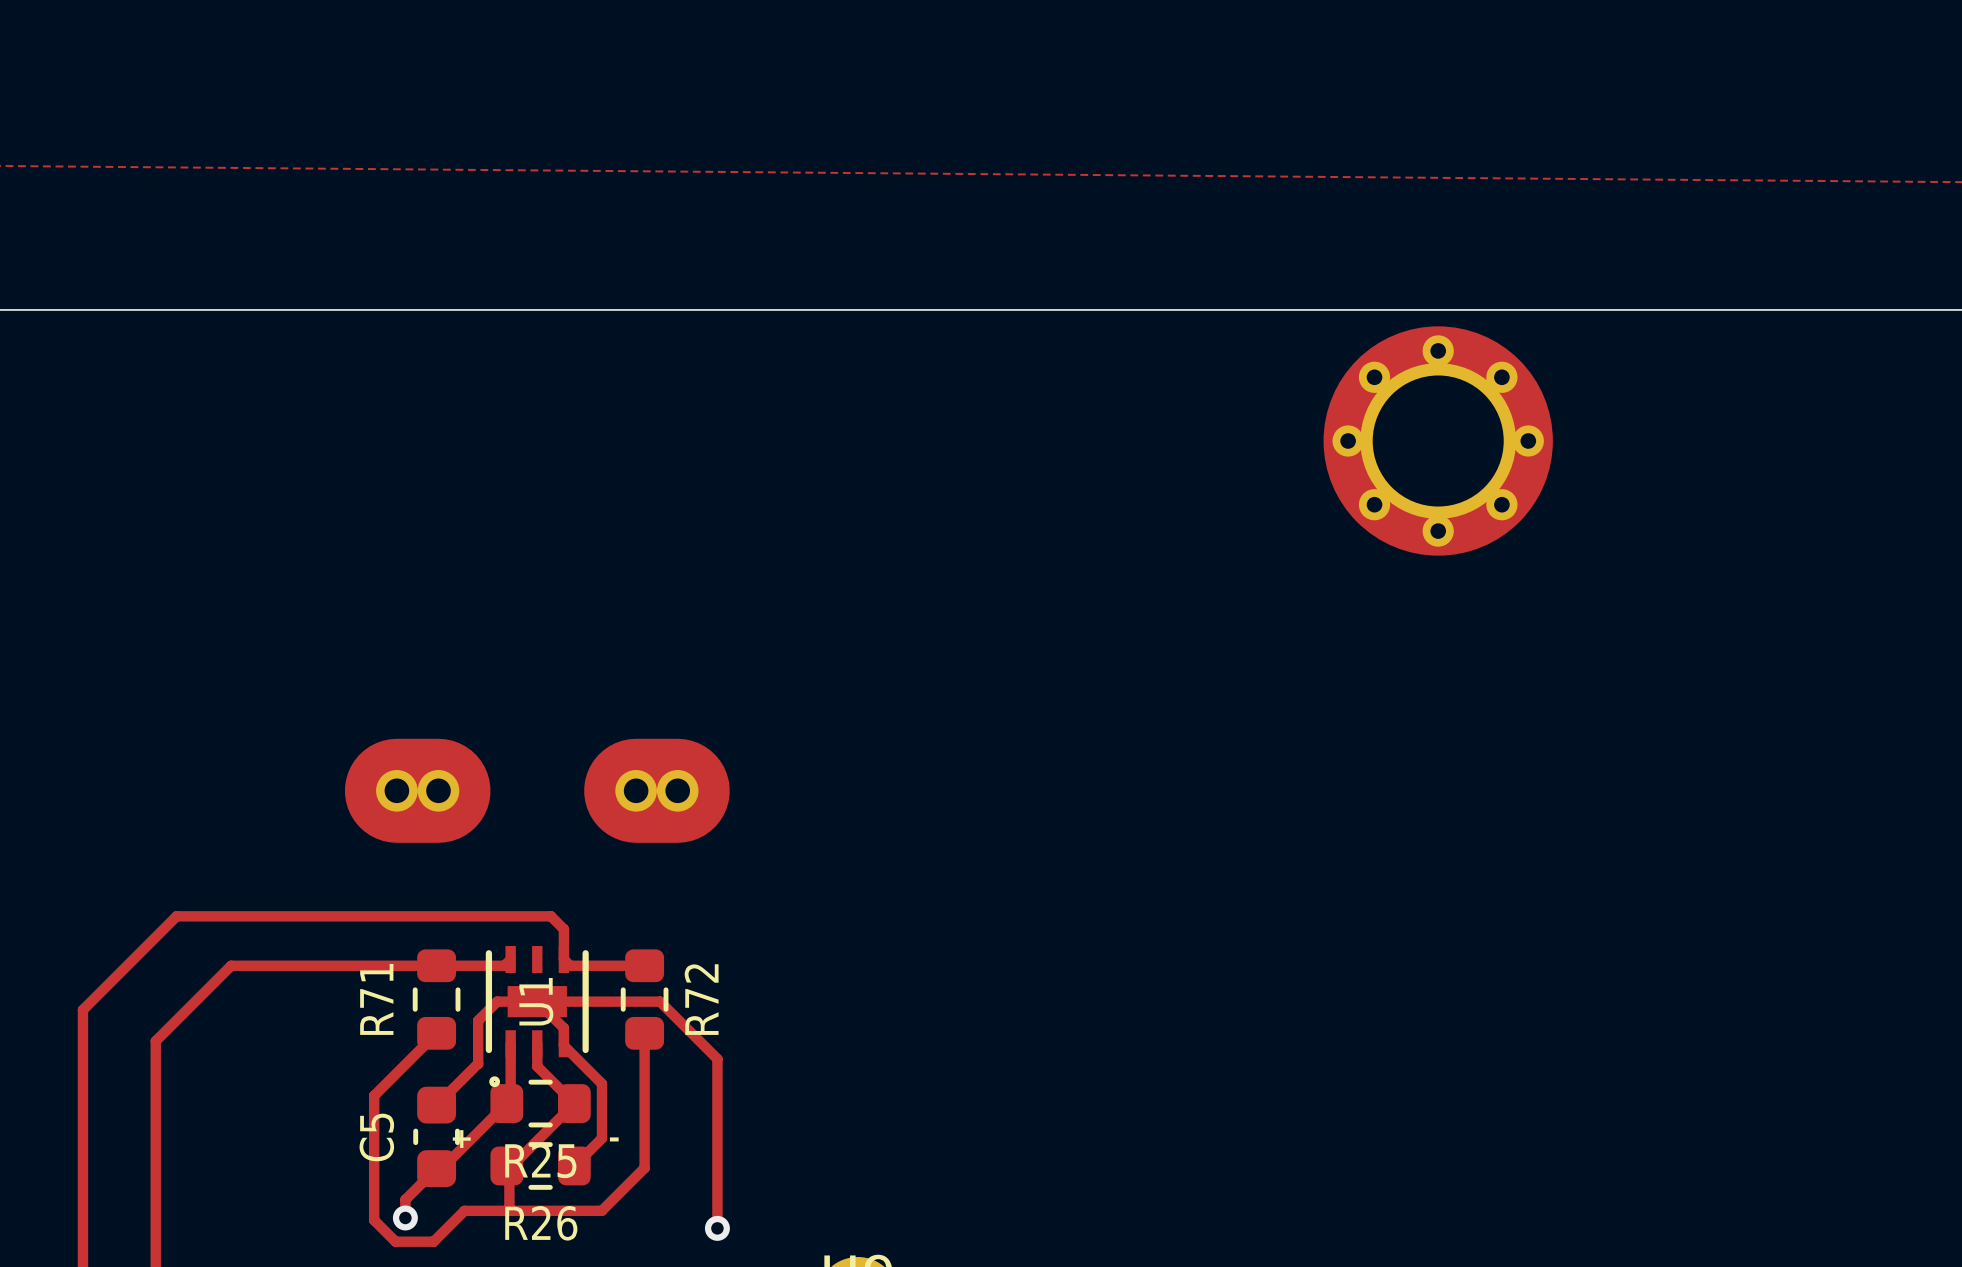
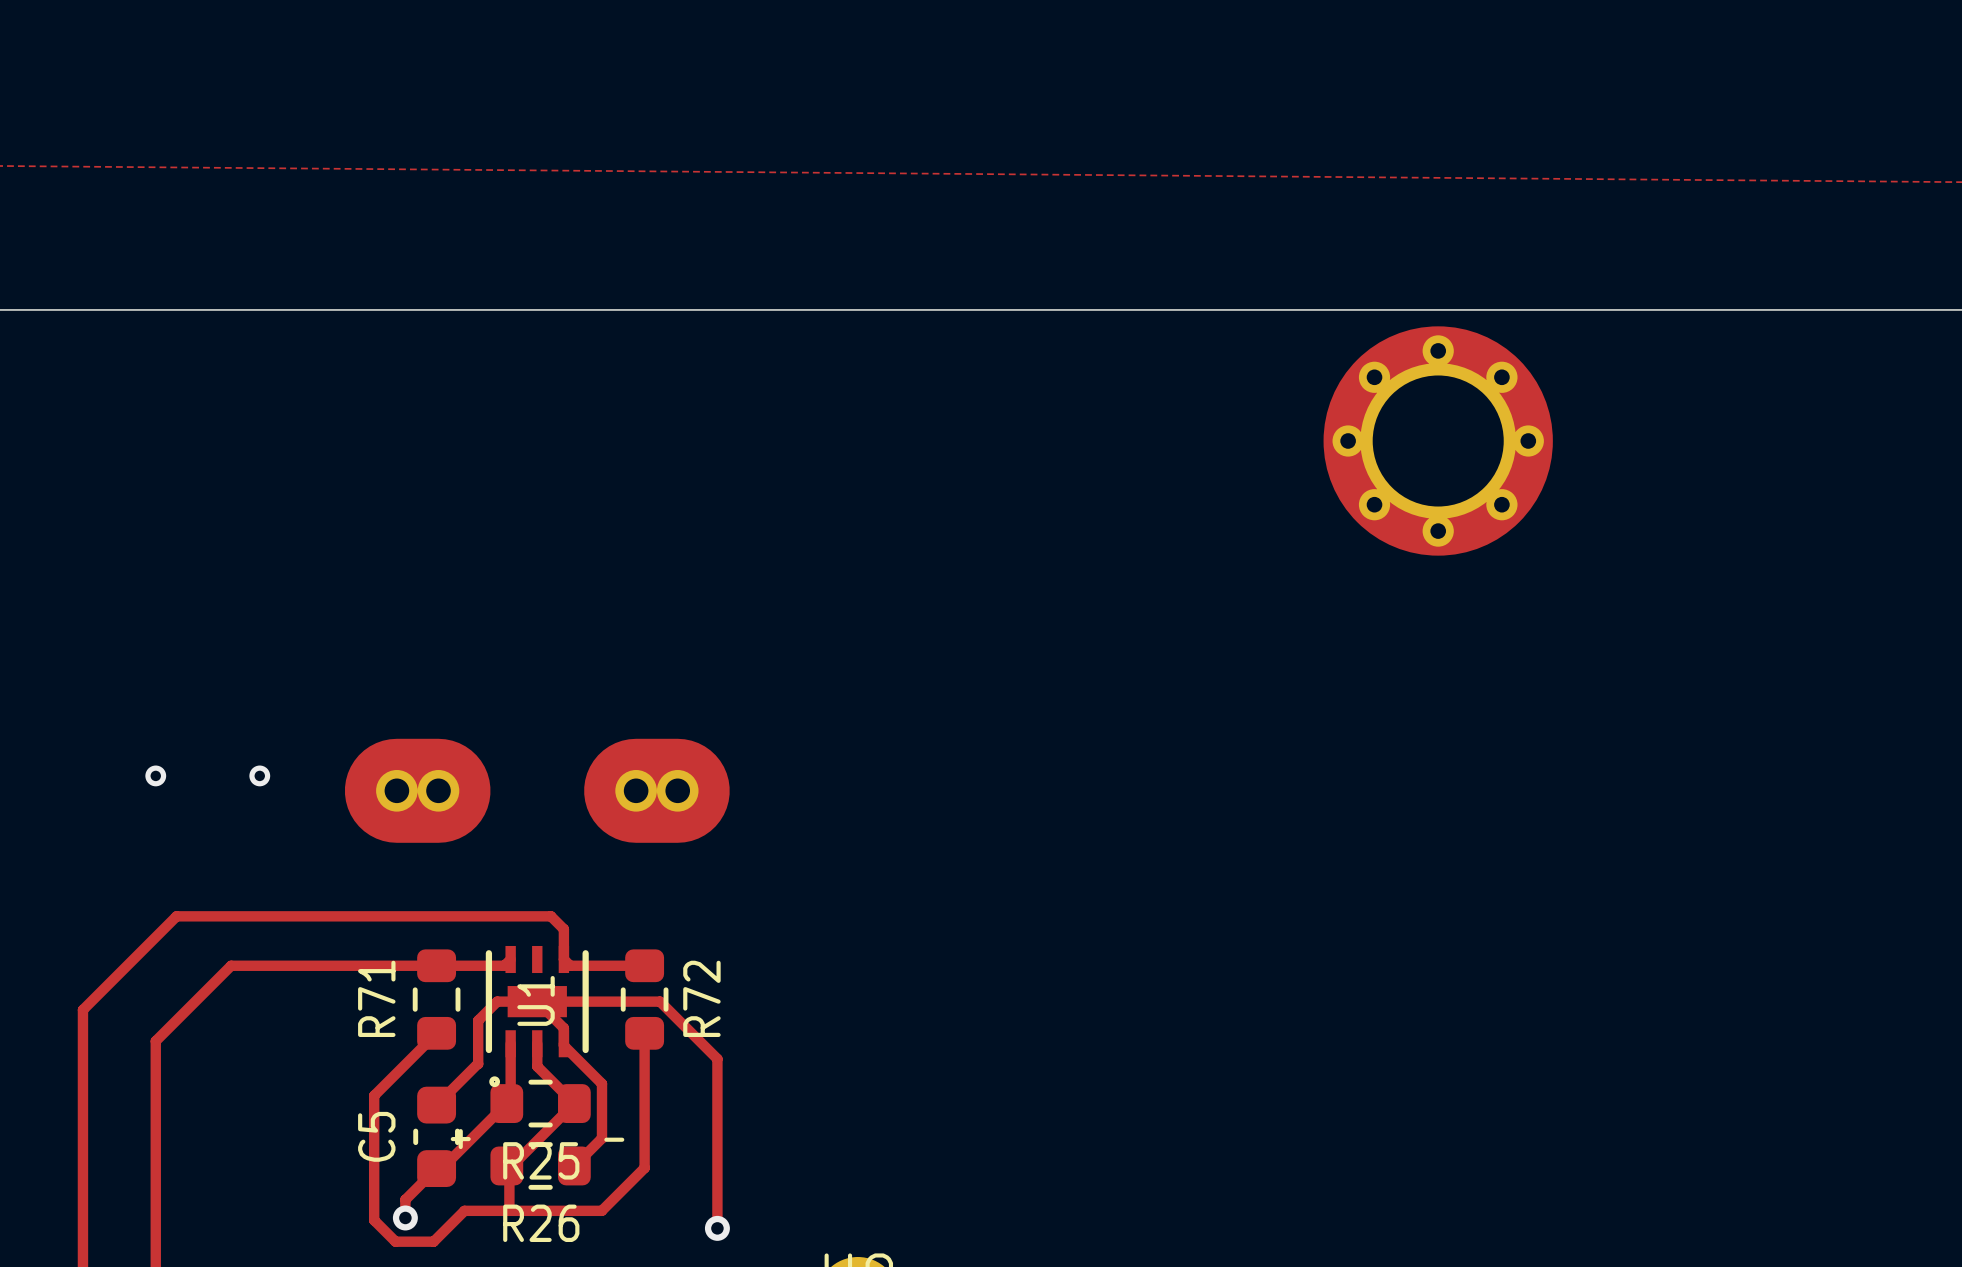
via: none -> (155, 775)
via: none -> (259, 775)

